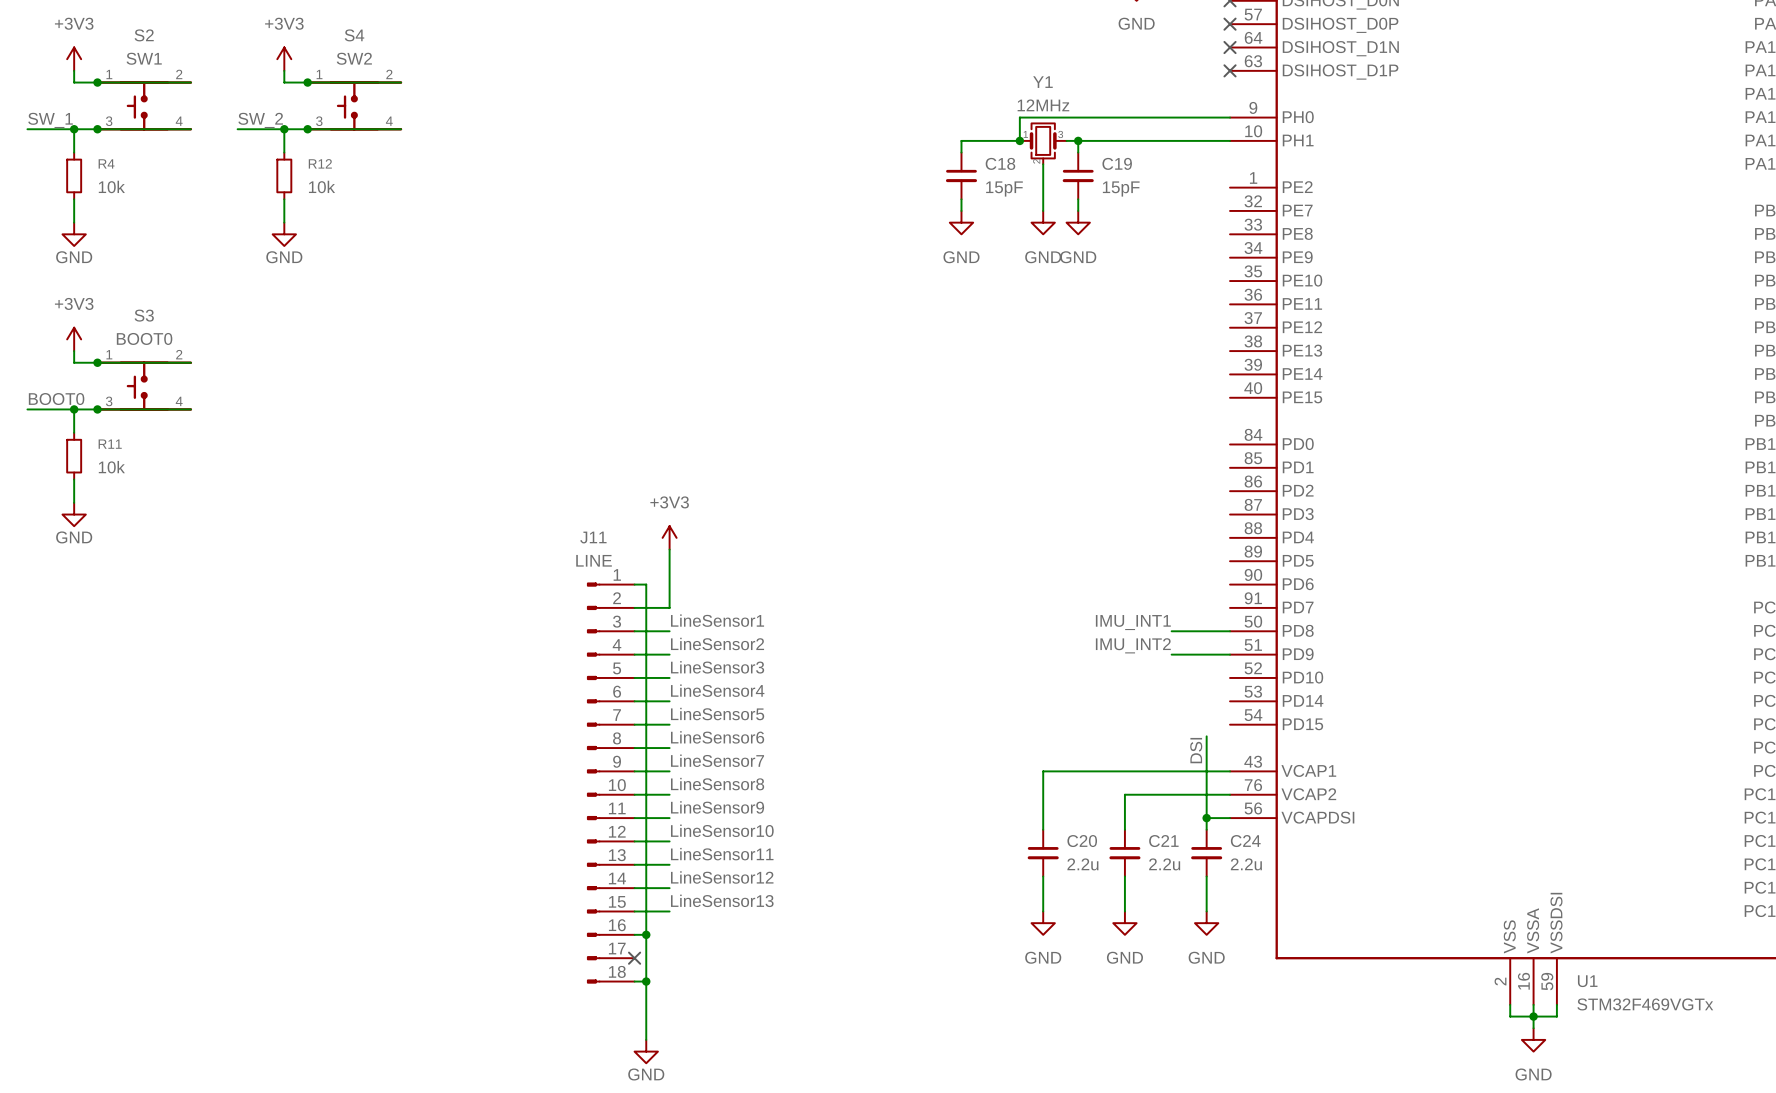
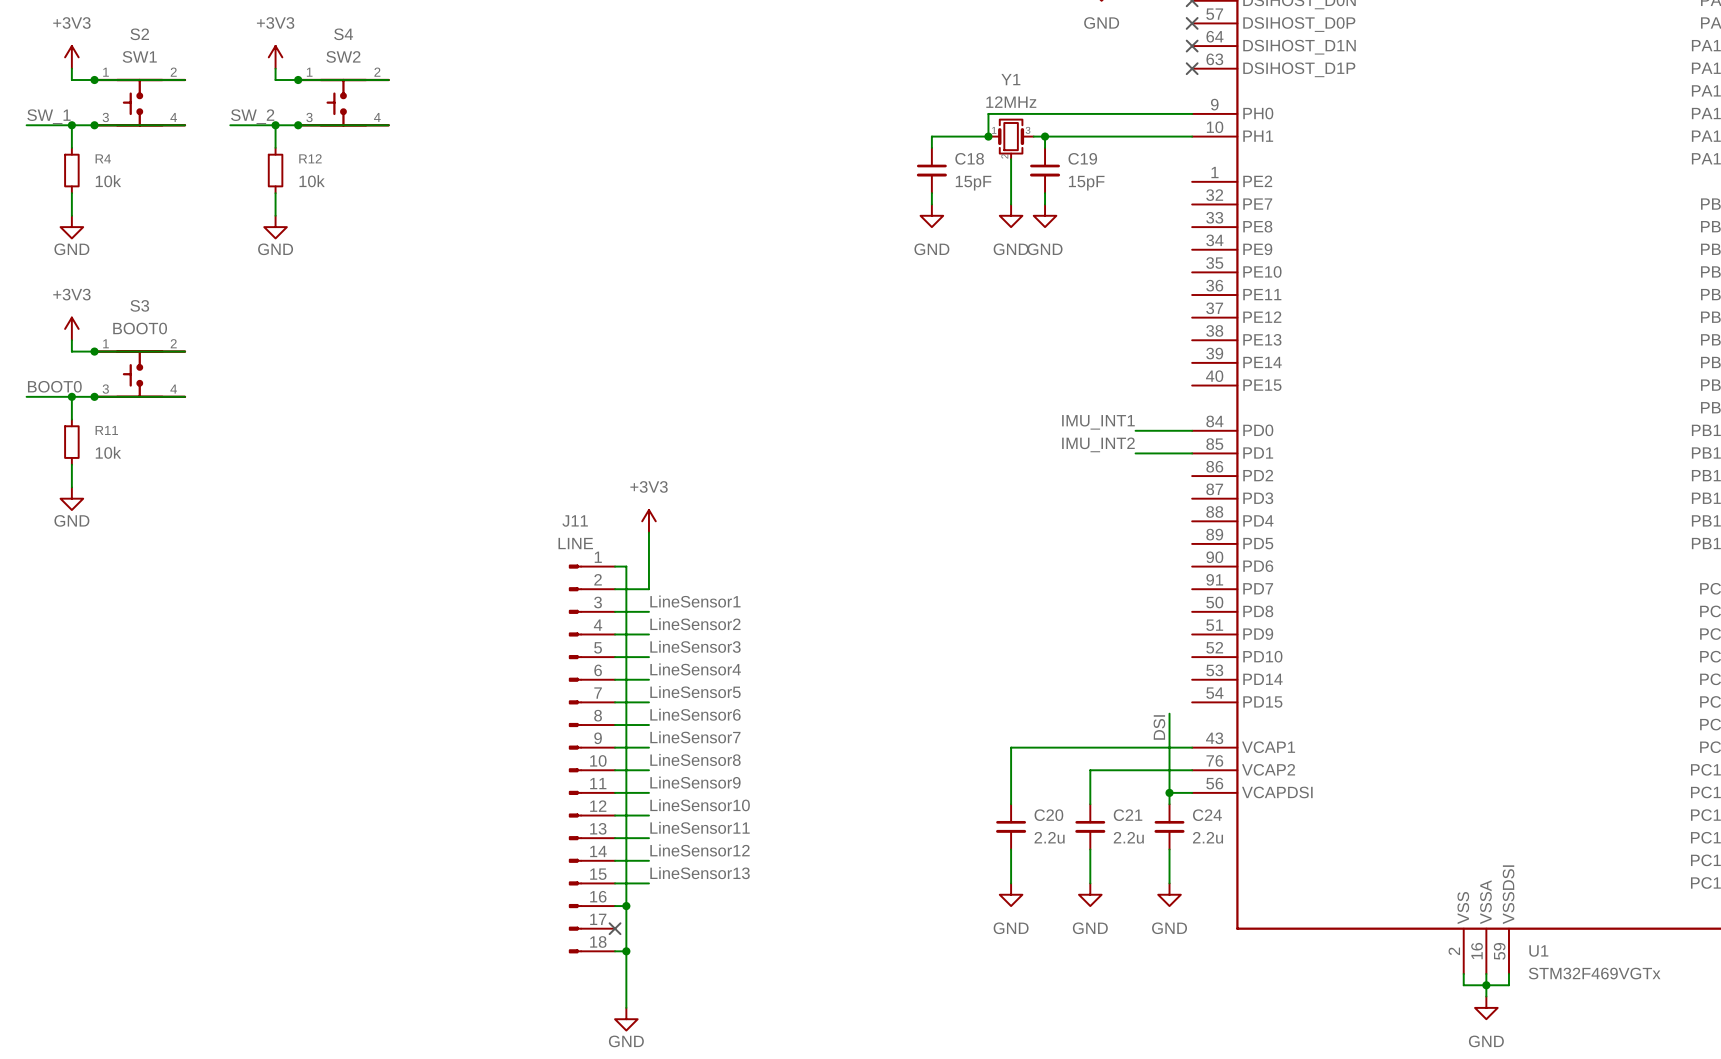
label position: IMU_INT1 (1133, 622) -> IMU_INT1 (1098, 422)
wire: (1171, 631) (1230, 631) -> (1135, 453) (1192, 453)
label position: IMU_INT2 (1133, 645) -> IMU_INT2 (1098, 444)
wire: (1171, 654) (1230, 654) -> (1135, 430) (1192, 430)

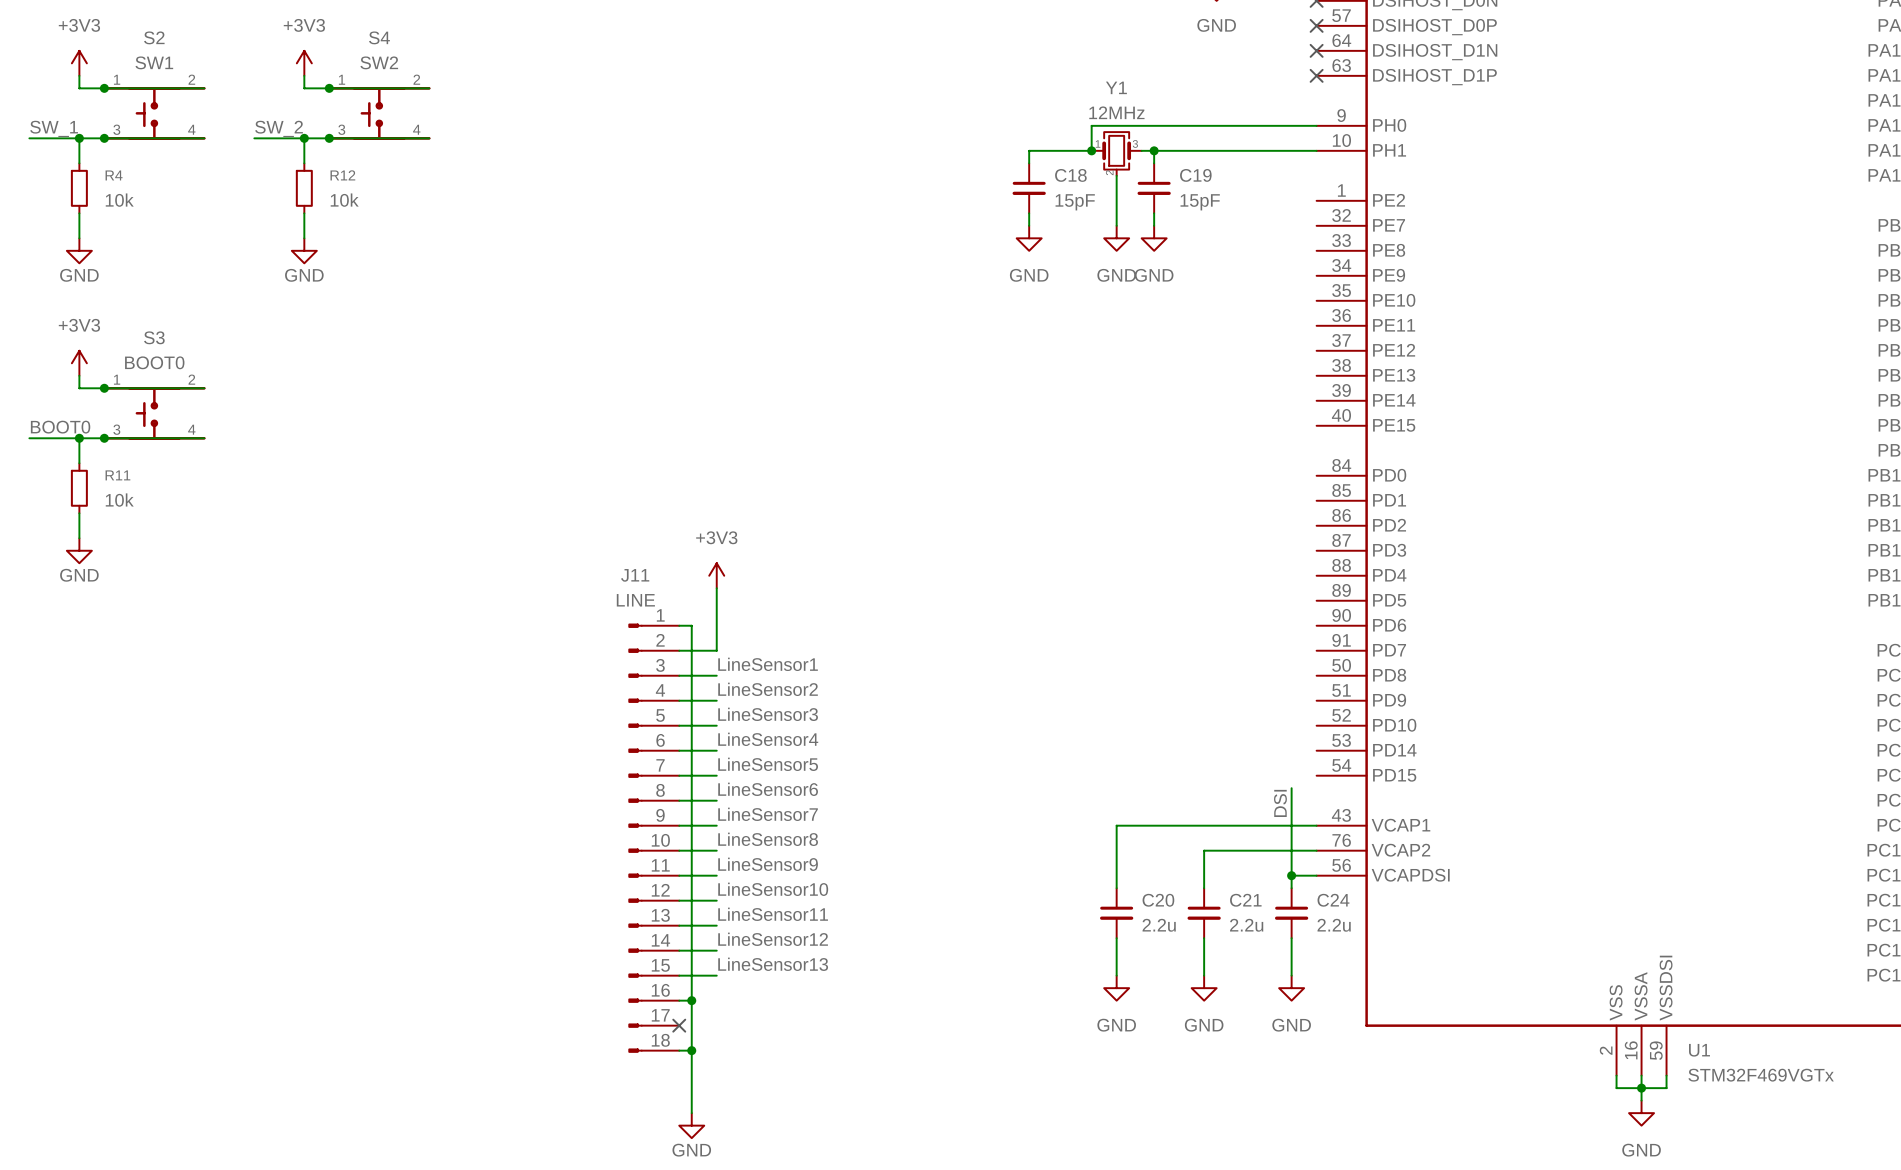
label: IMU_INT1 (1098, 422) -> none
wire: (1135, 430) (1192, 430) -> none
label: IMU_INT2 (1098, 444) -> none
wire: (1135, 453) (1192, 453) -> none

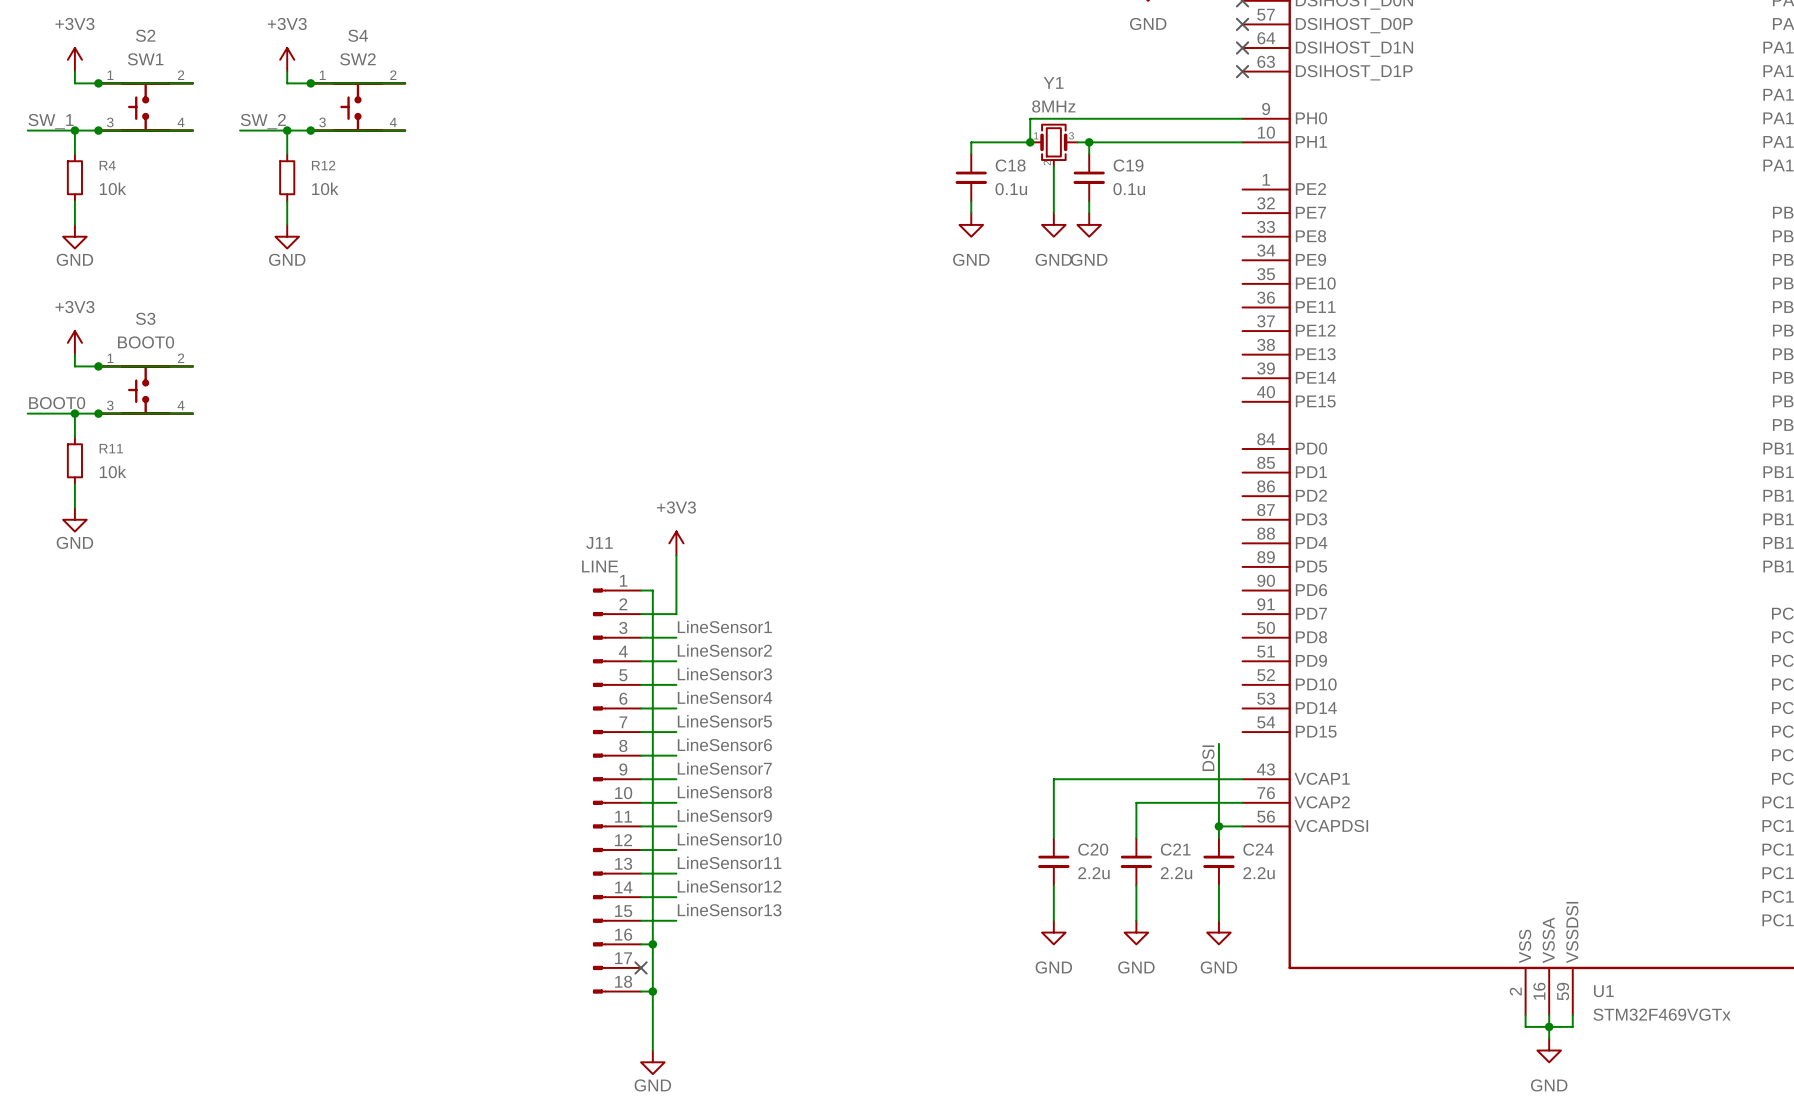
Y1 value: 12MHz (1116, 112) -> 8MHz (1053, 106)
C18 value: 15pF (1075, 202) -> 0.1u (1011, 189)
C19 value: 15pF (1200, 202) -> 0.1u (1129, 189)

